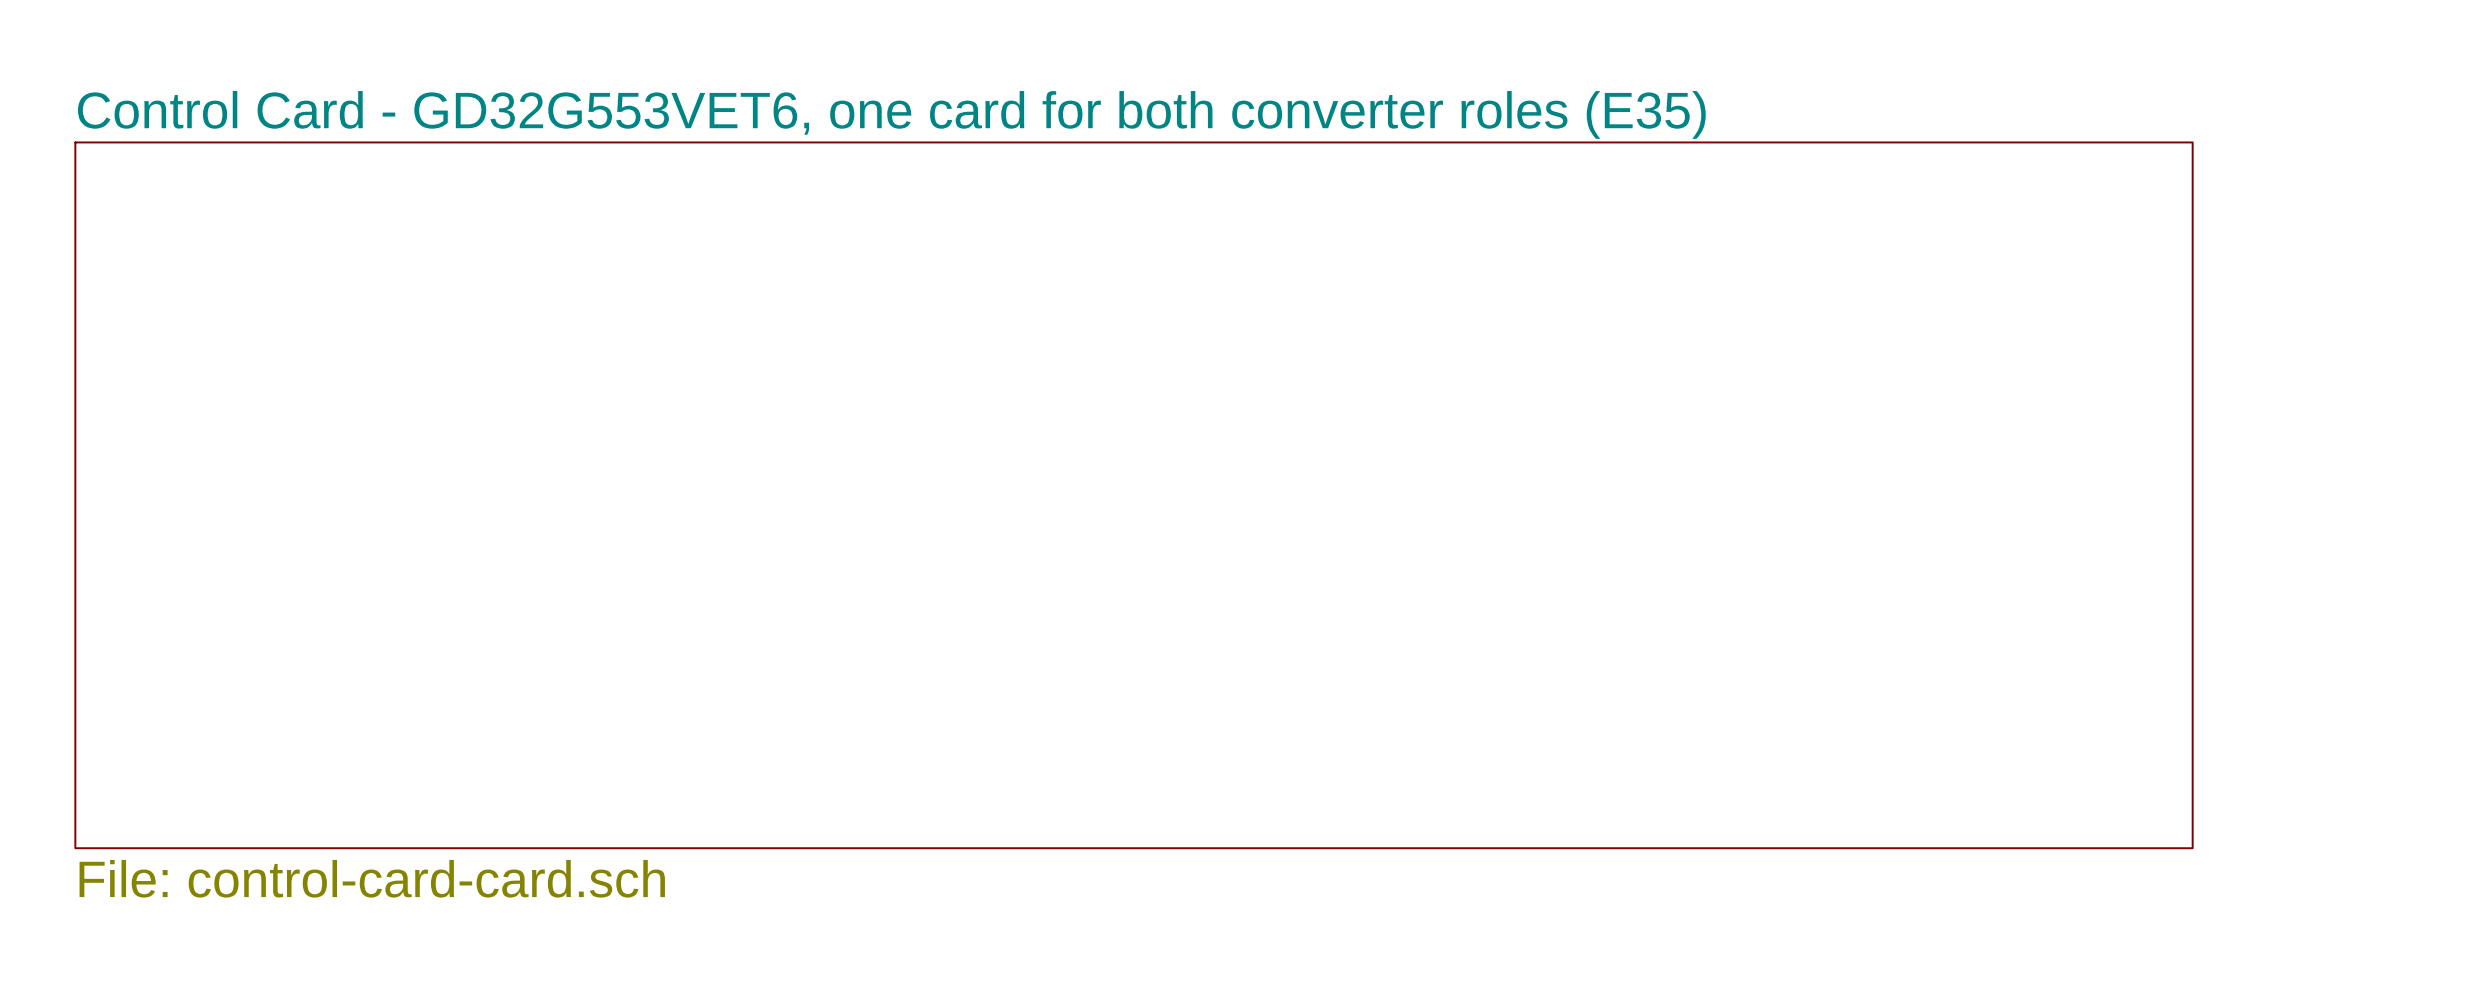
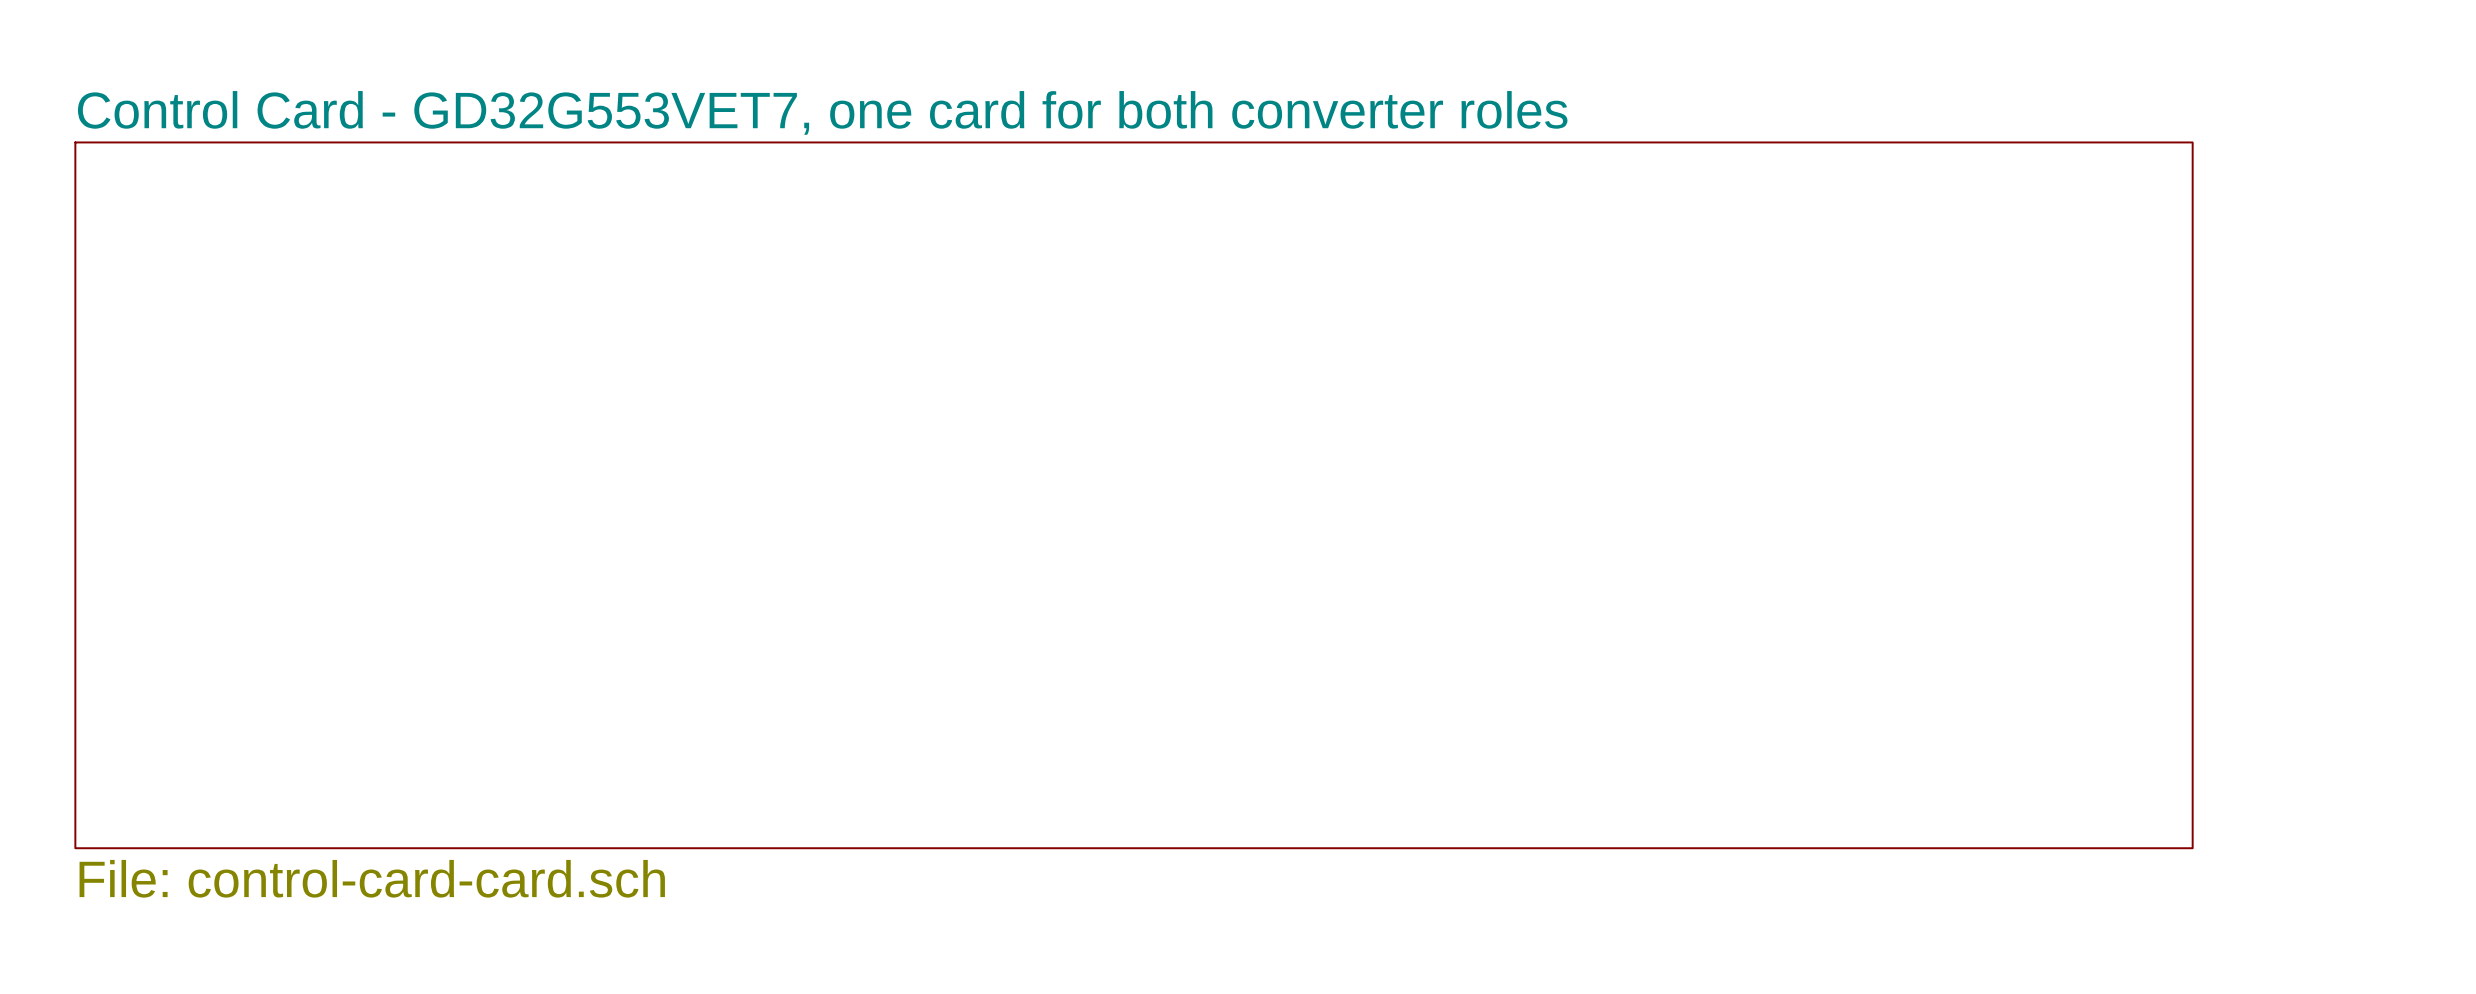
sheet Control Card - GD32G553VET6, one card for both converter roles (E35) name: Control Card - GD32G553VET6, one card for both converter roles (E35) (891, 114) -> Control Card - GD32G553VET7, one card for both converter roles (822, 112)

